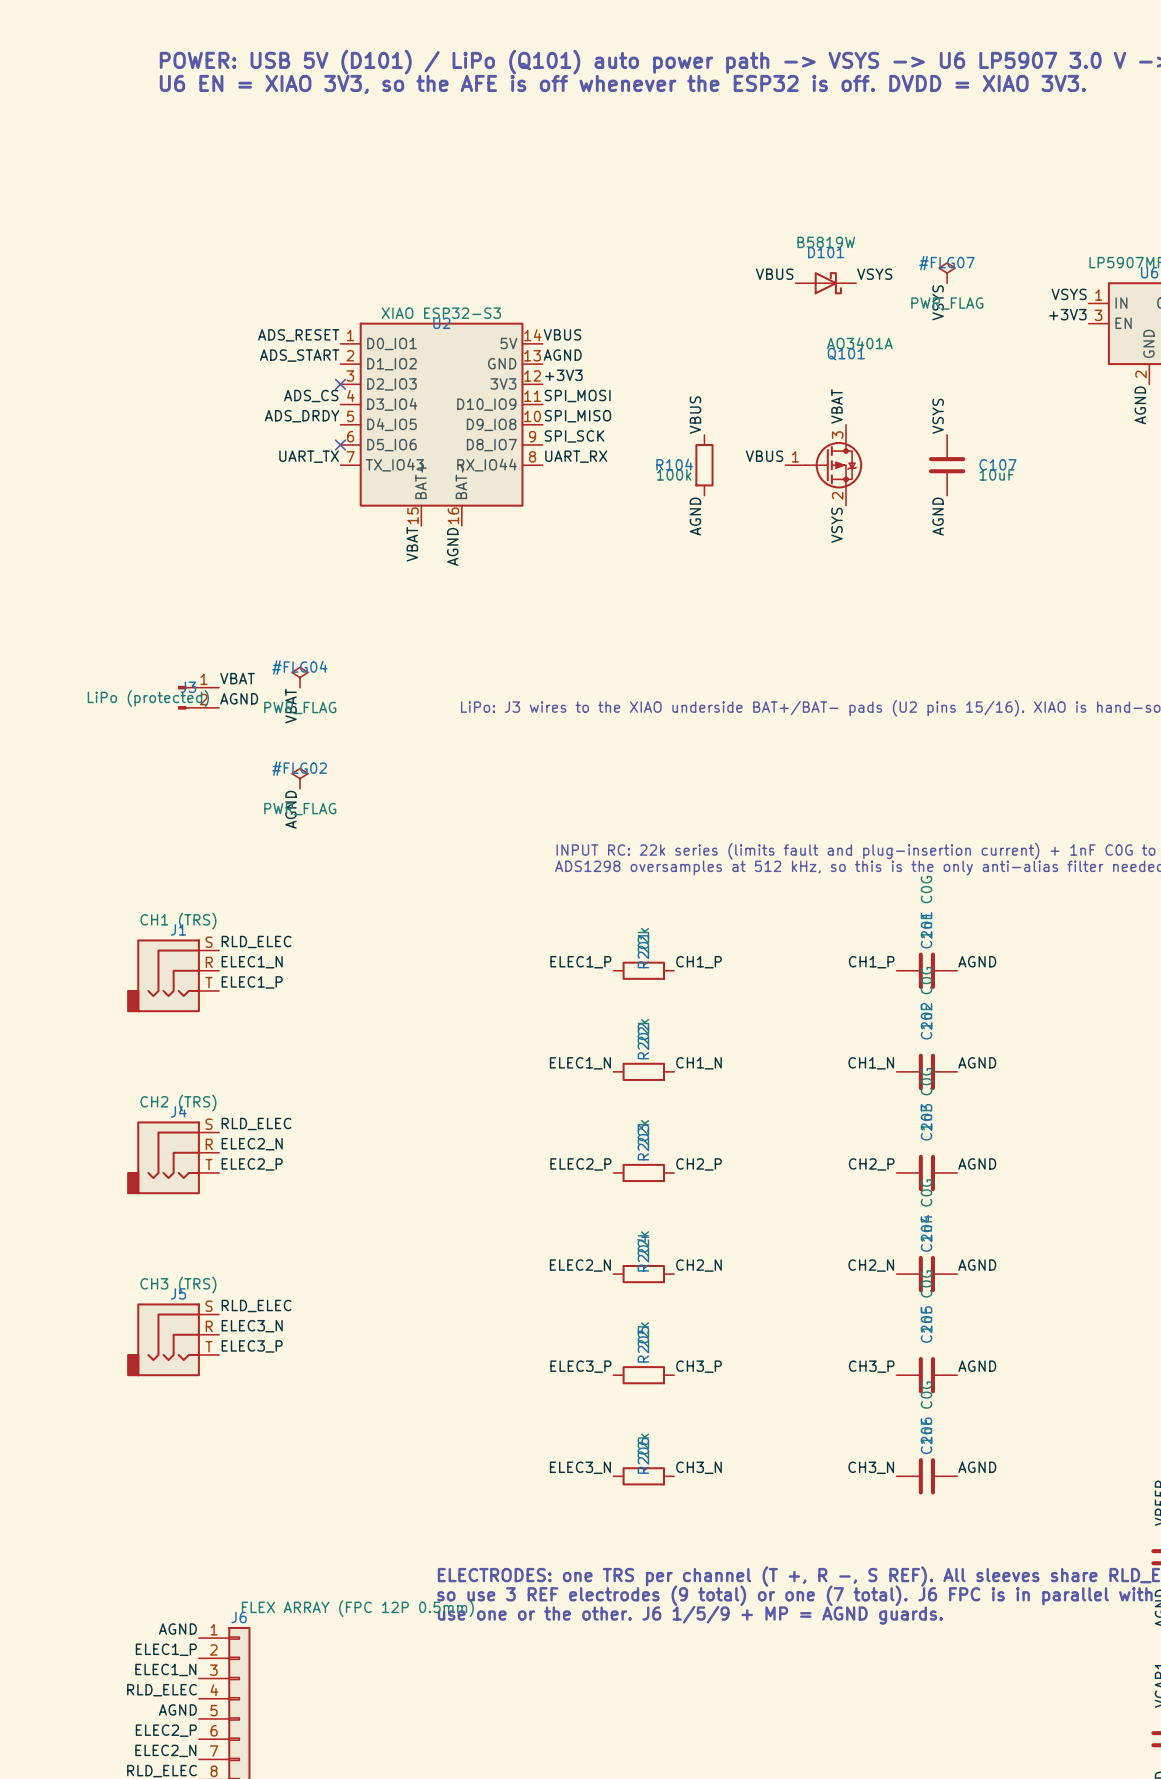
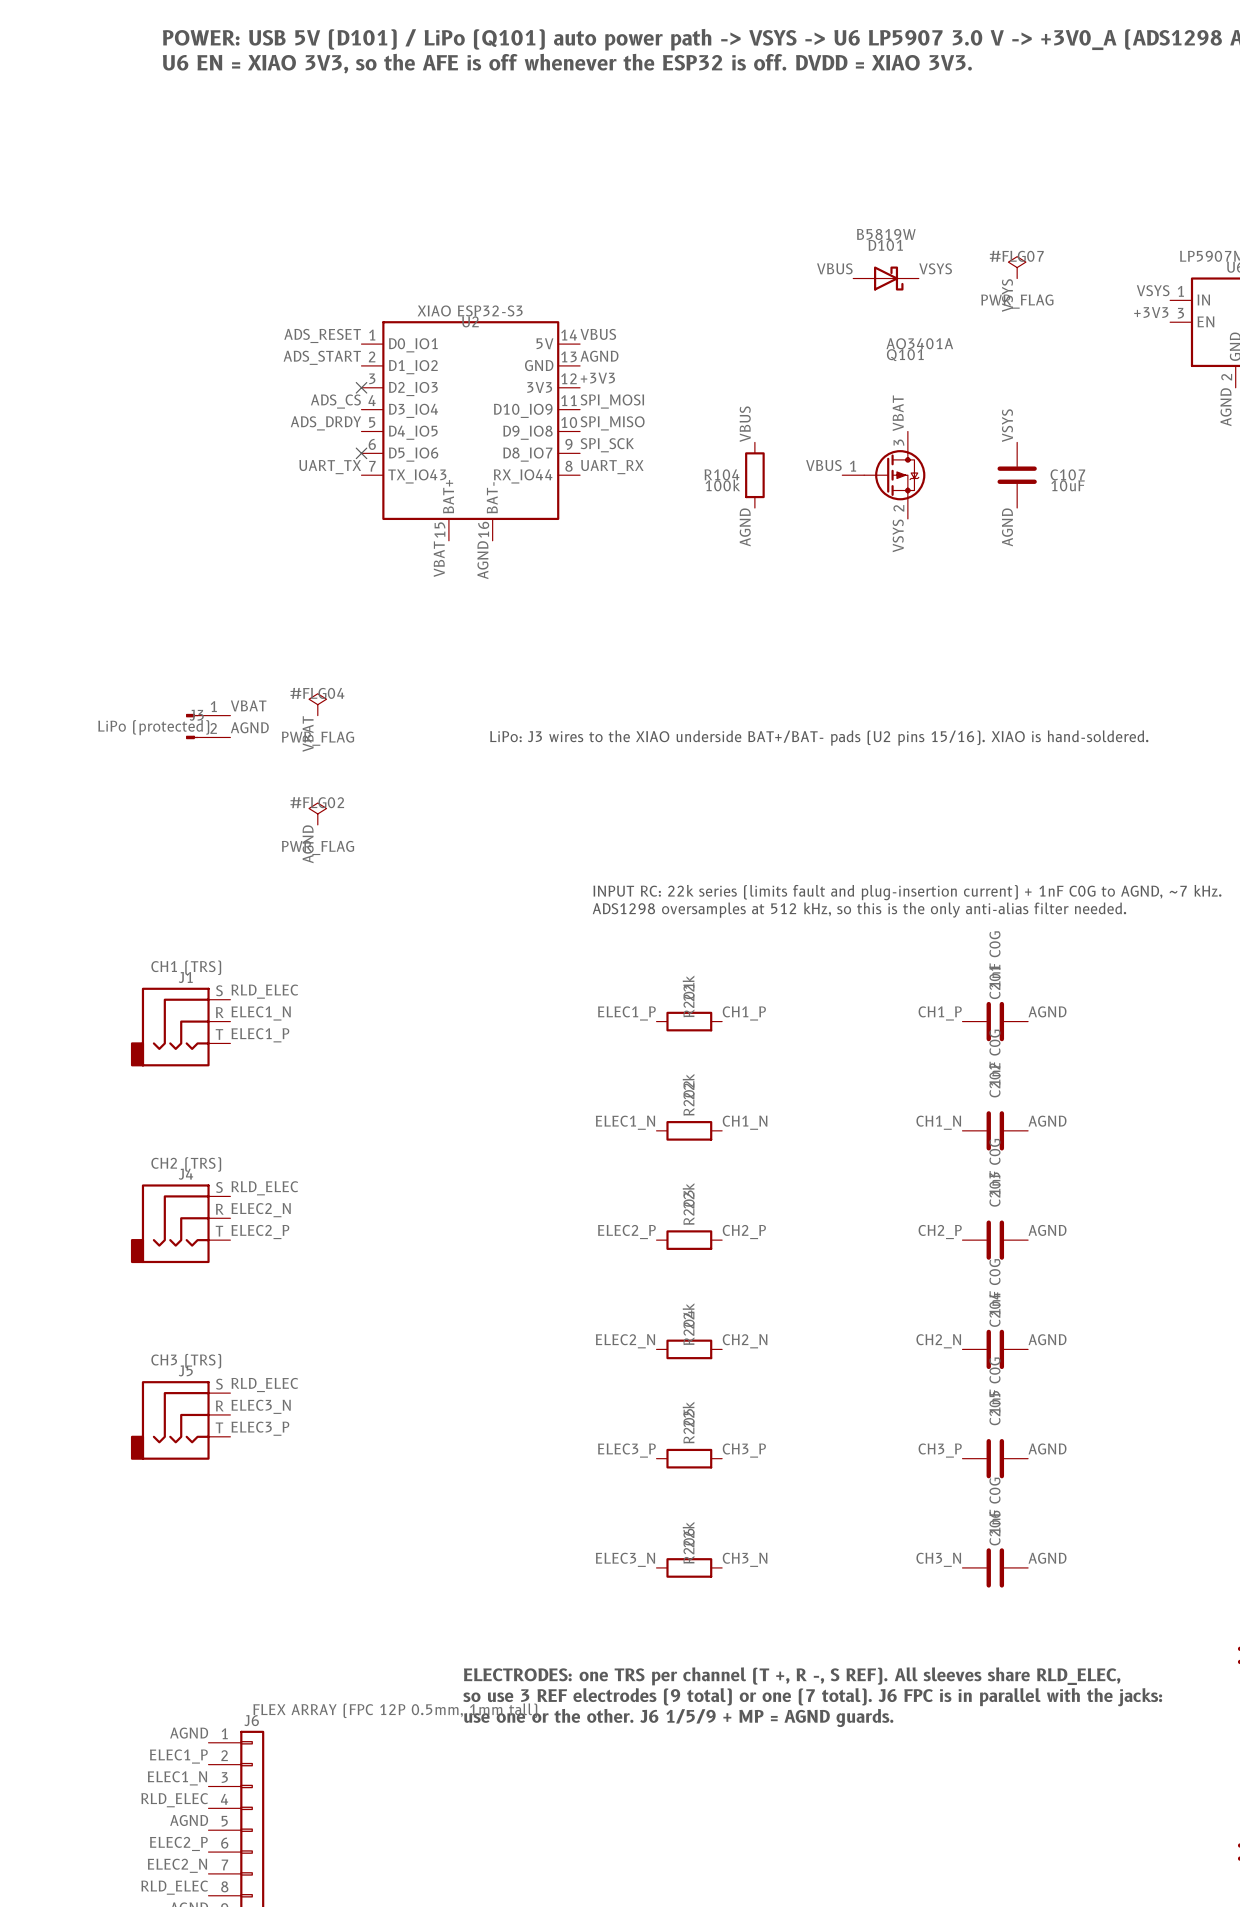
J6 value: FLEX ARRAY (FPC 12P 0.5mm) (357, 1608) -> FLEX ARRAY (FPC 12P 0.5mm, 1mm tall) (395, 1710)

